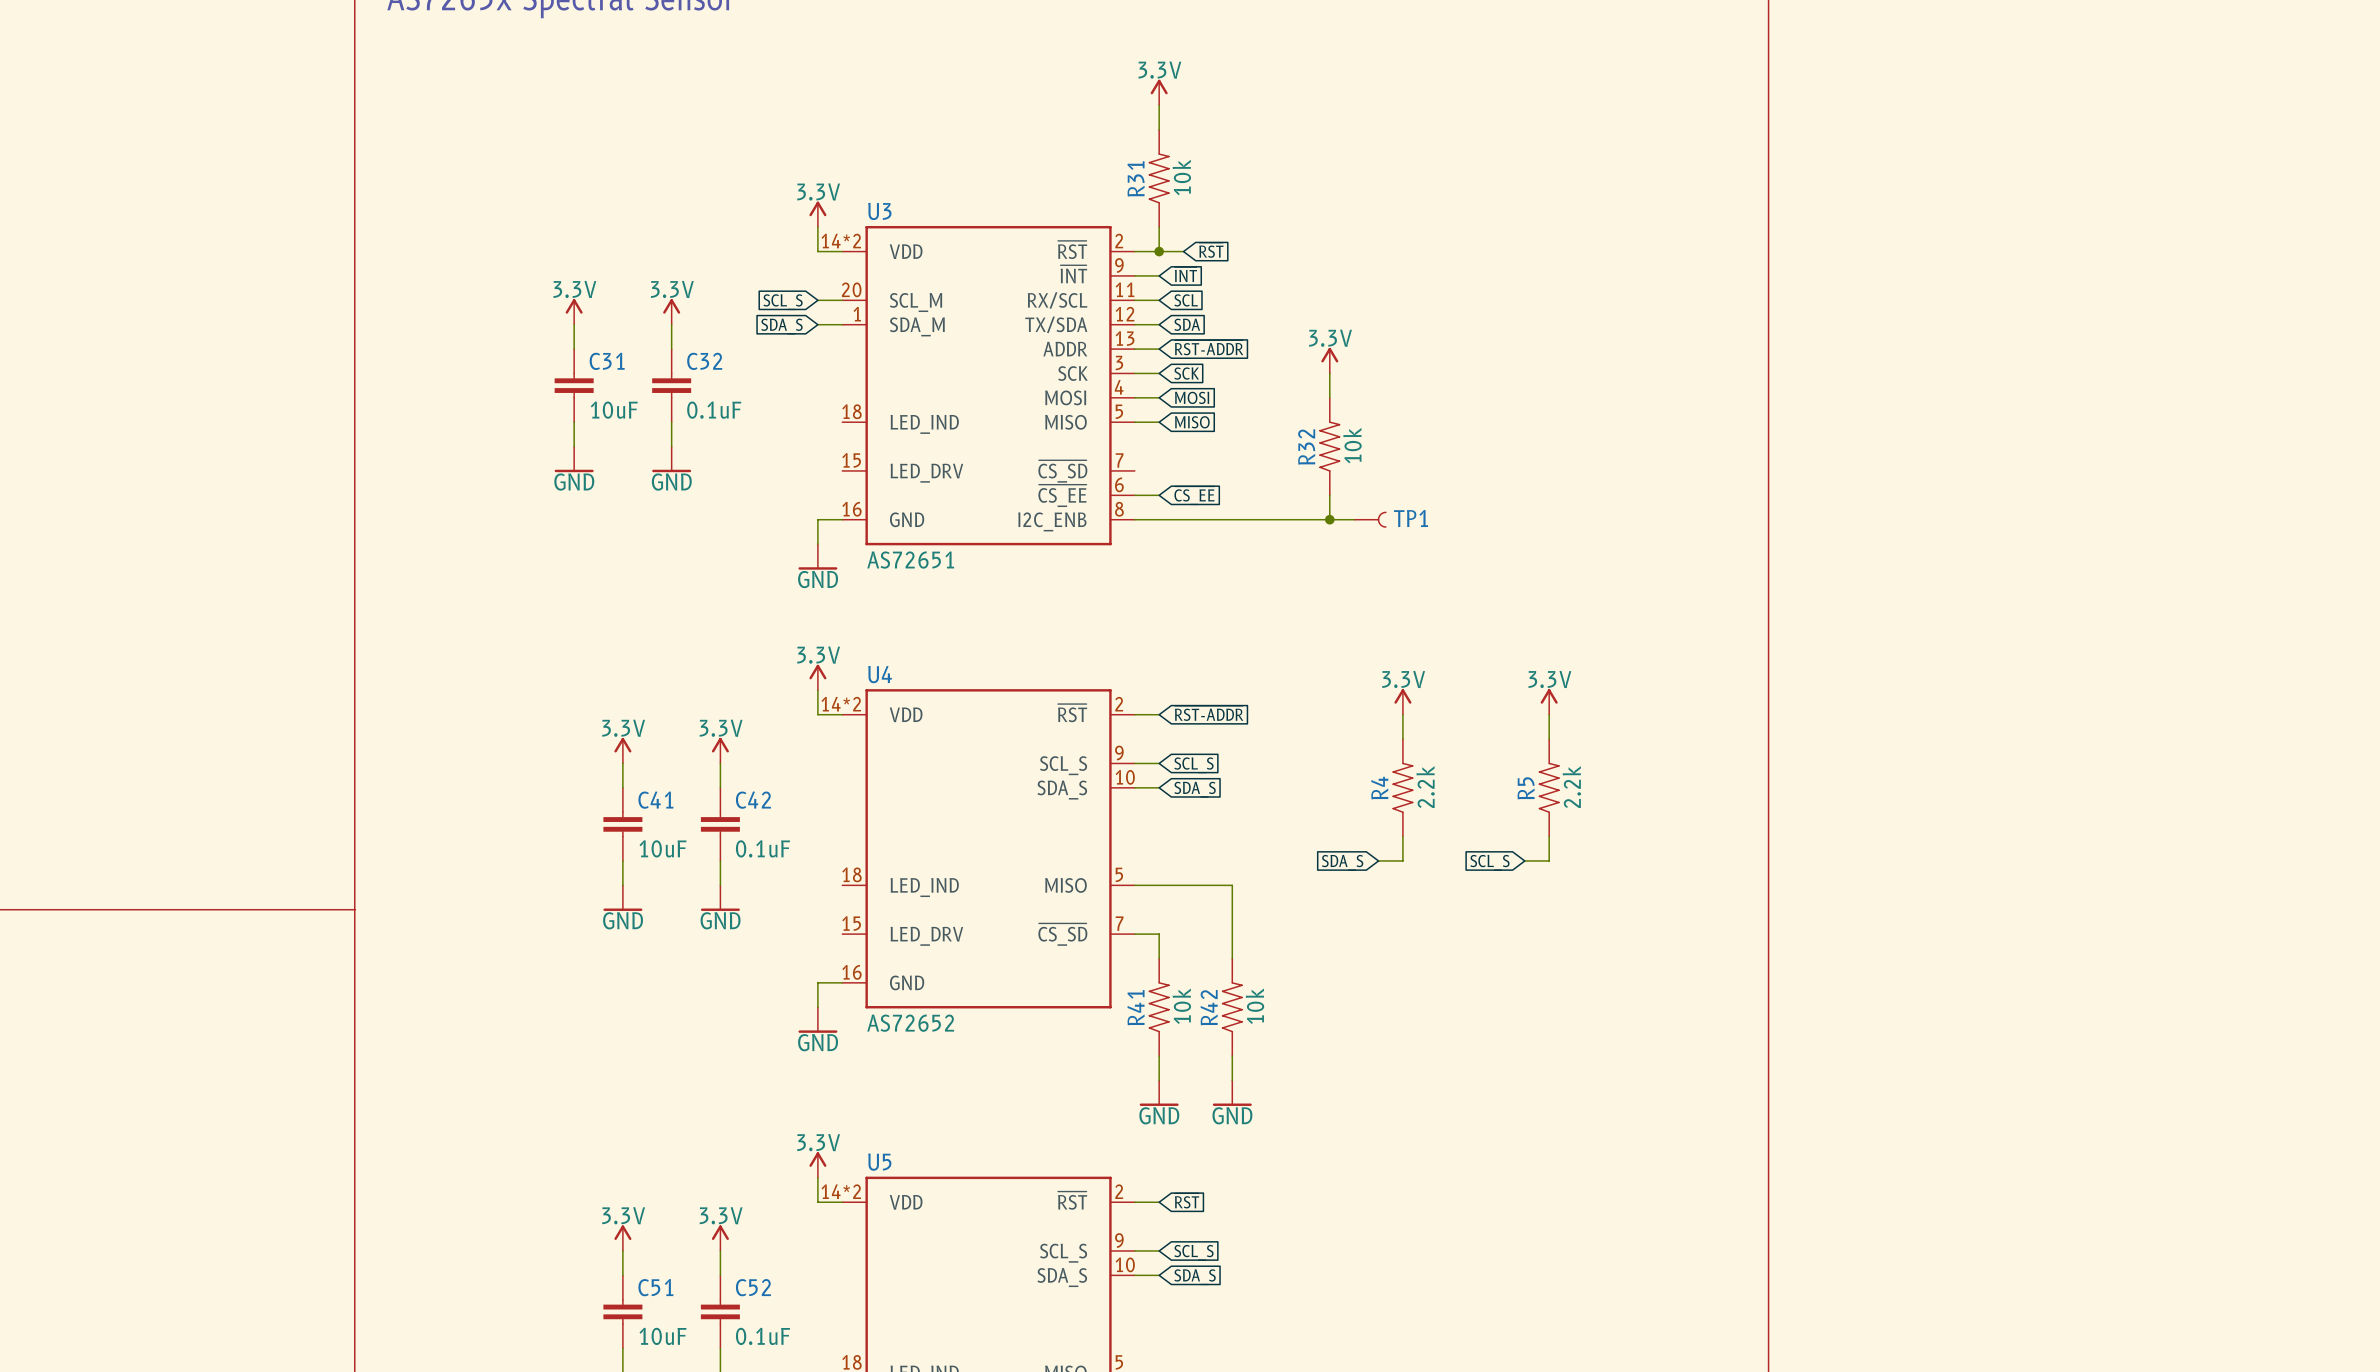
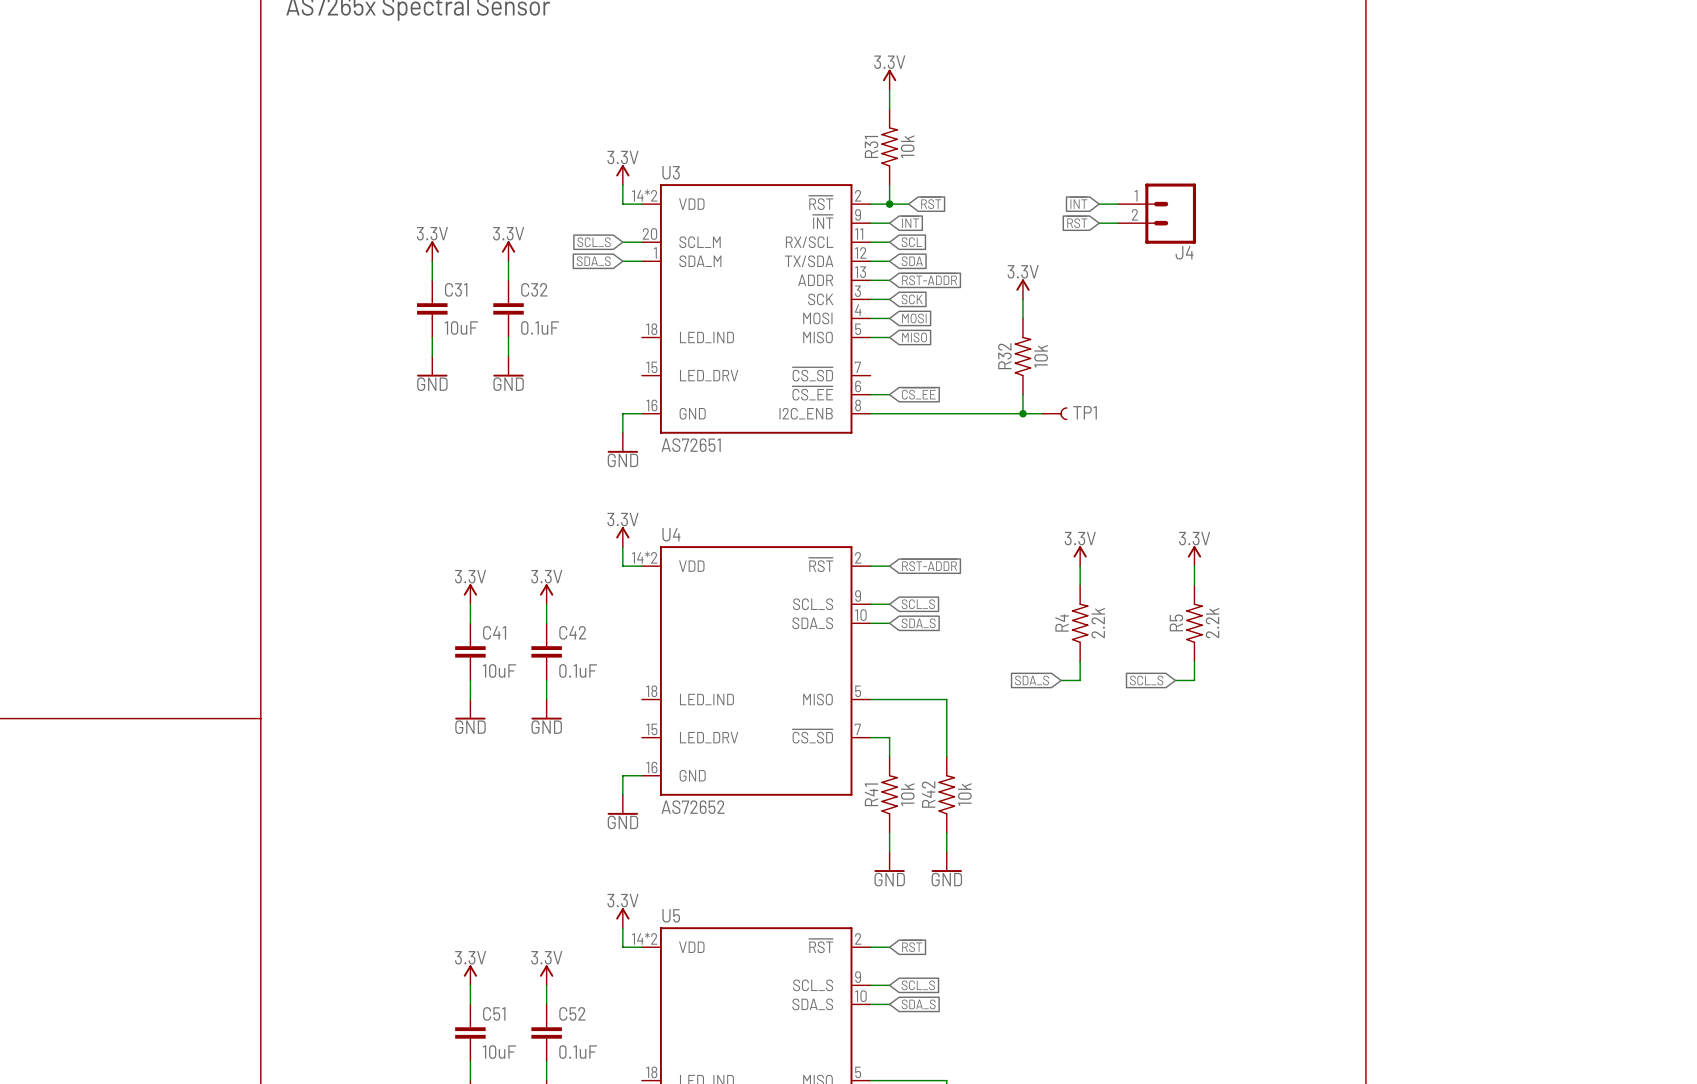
global label: none -> ~{INT} (1078, 203)
wire: none -> (1099, 204) (1118, 204)
J4: none -> (1157, 213)
global label: none -> ~{RST} (1077, 222)
wire: none -> (1099, 223) (1118, 223)

